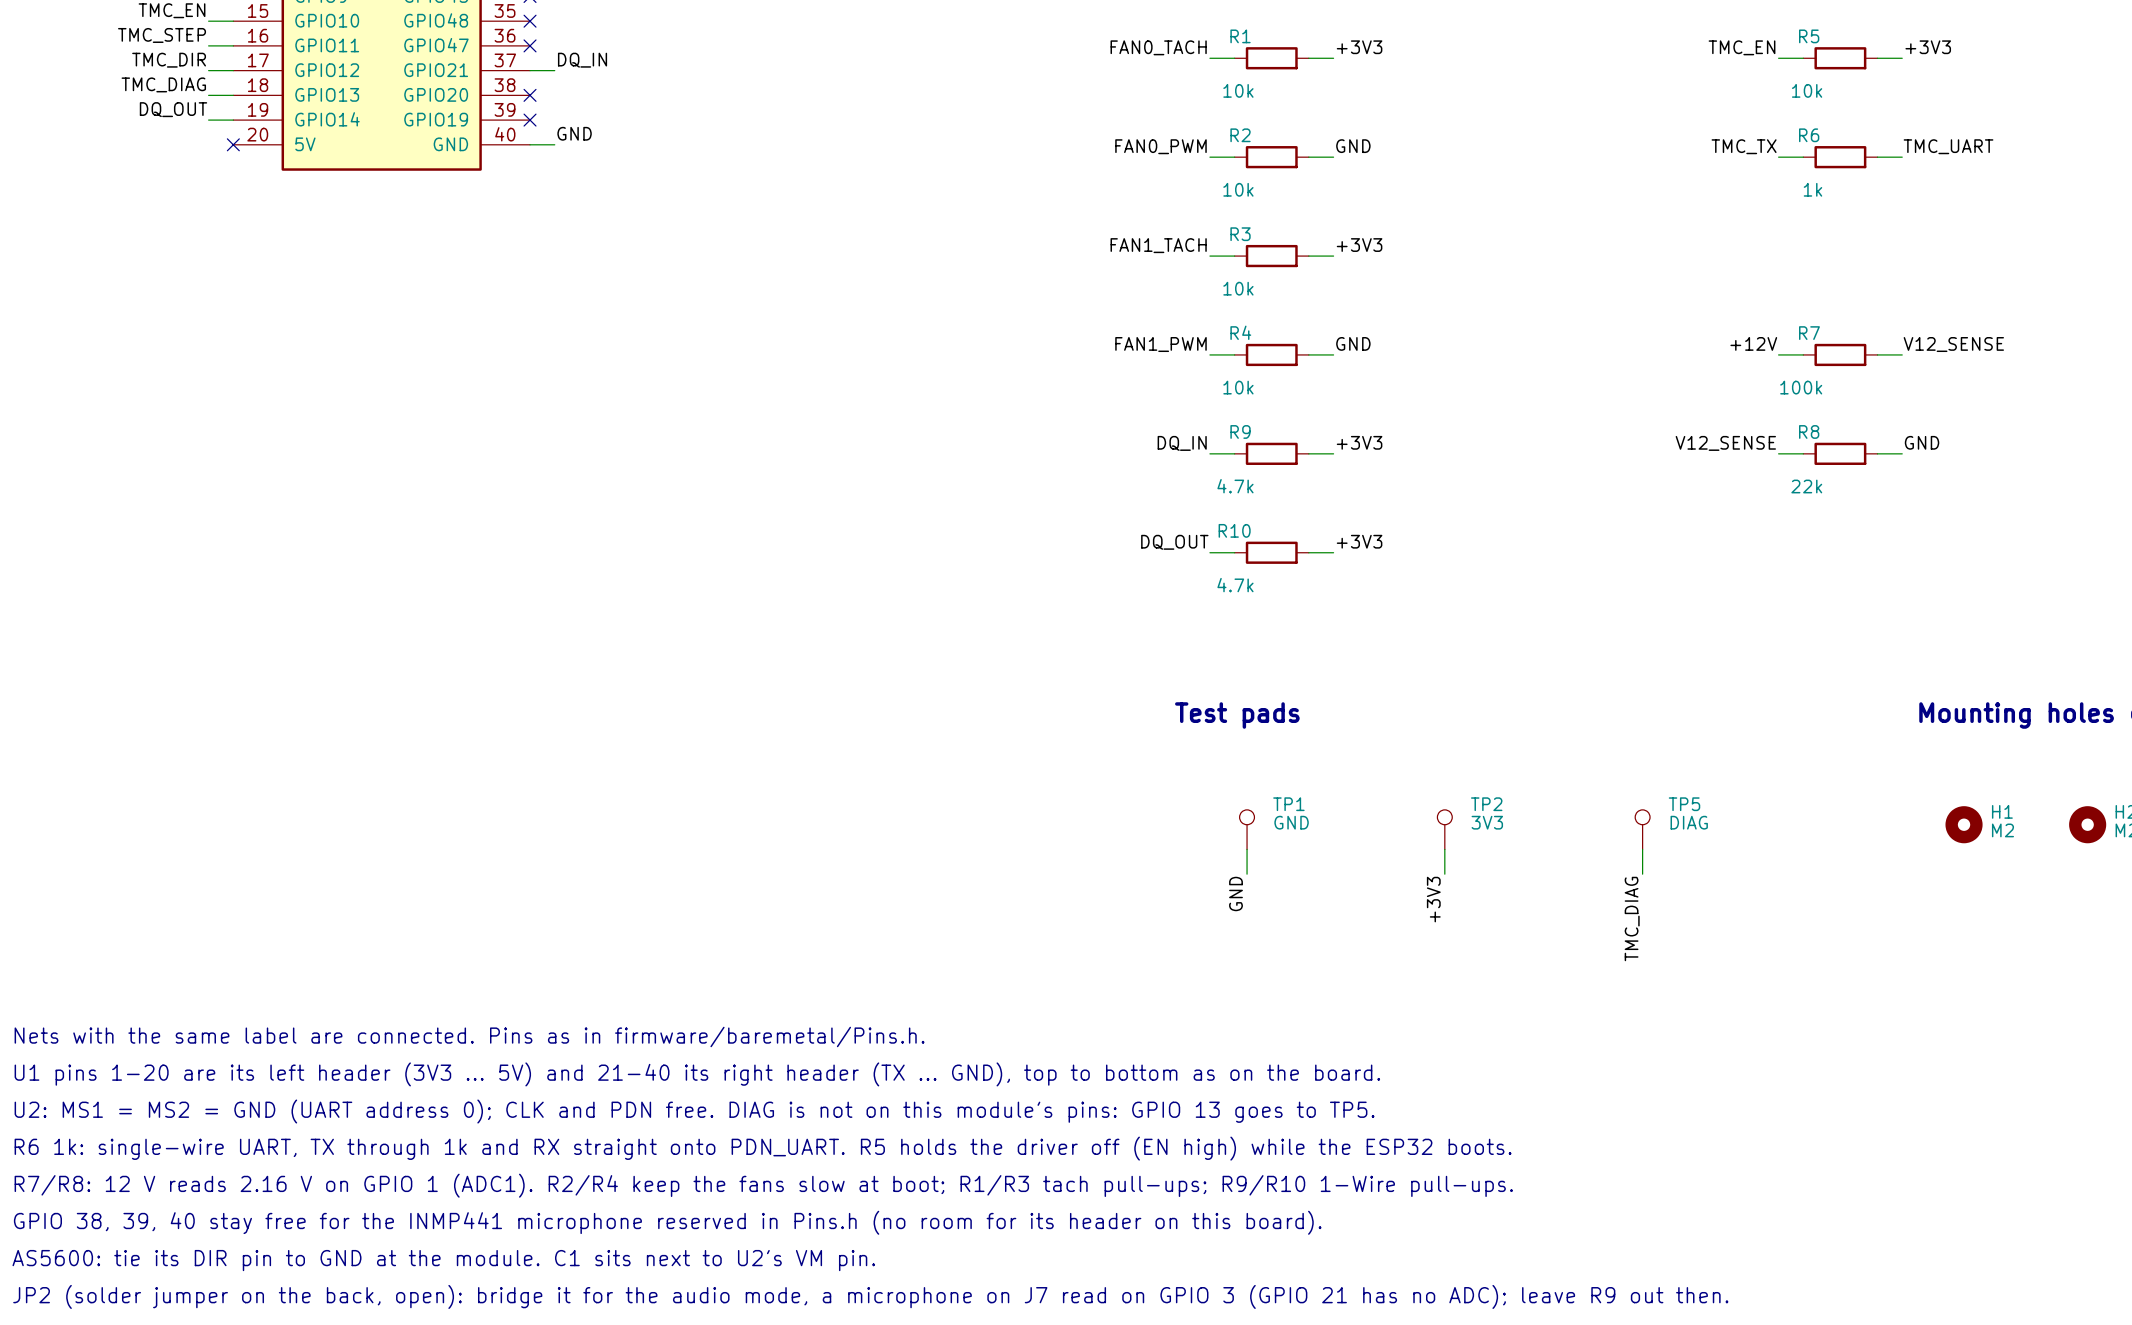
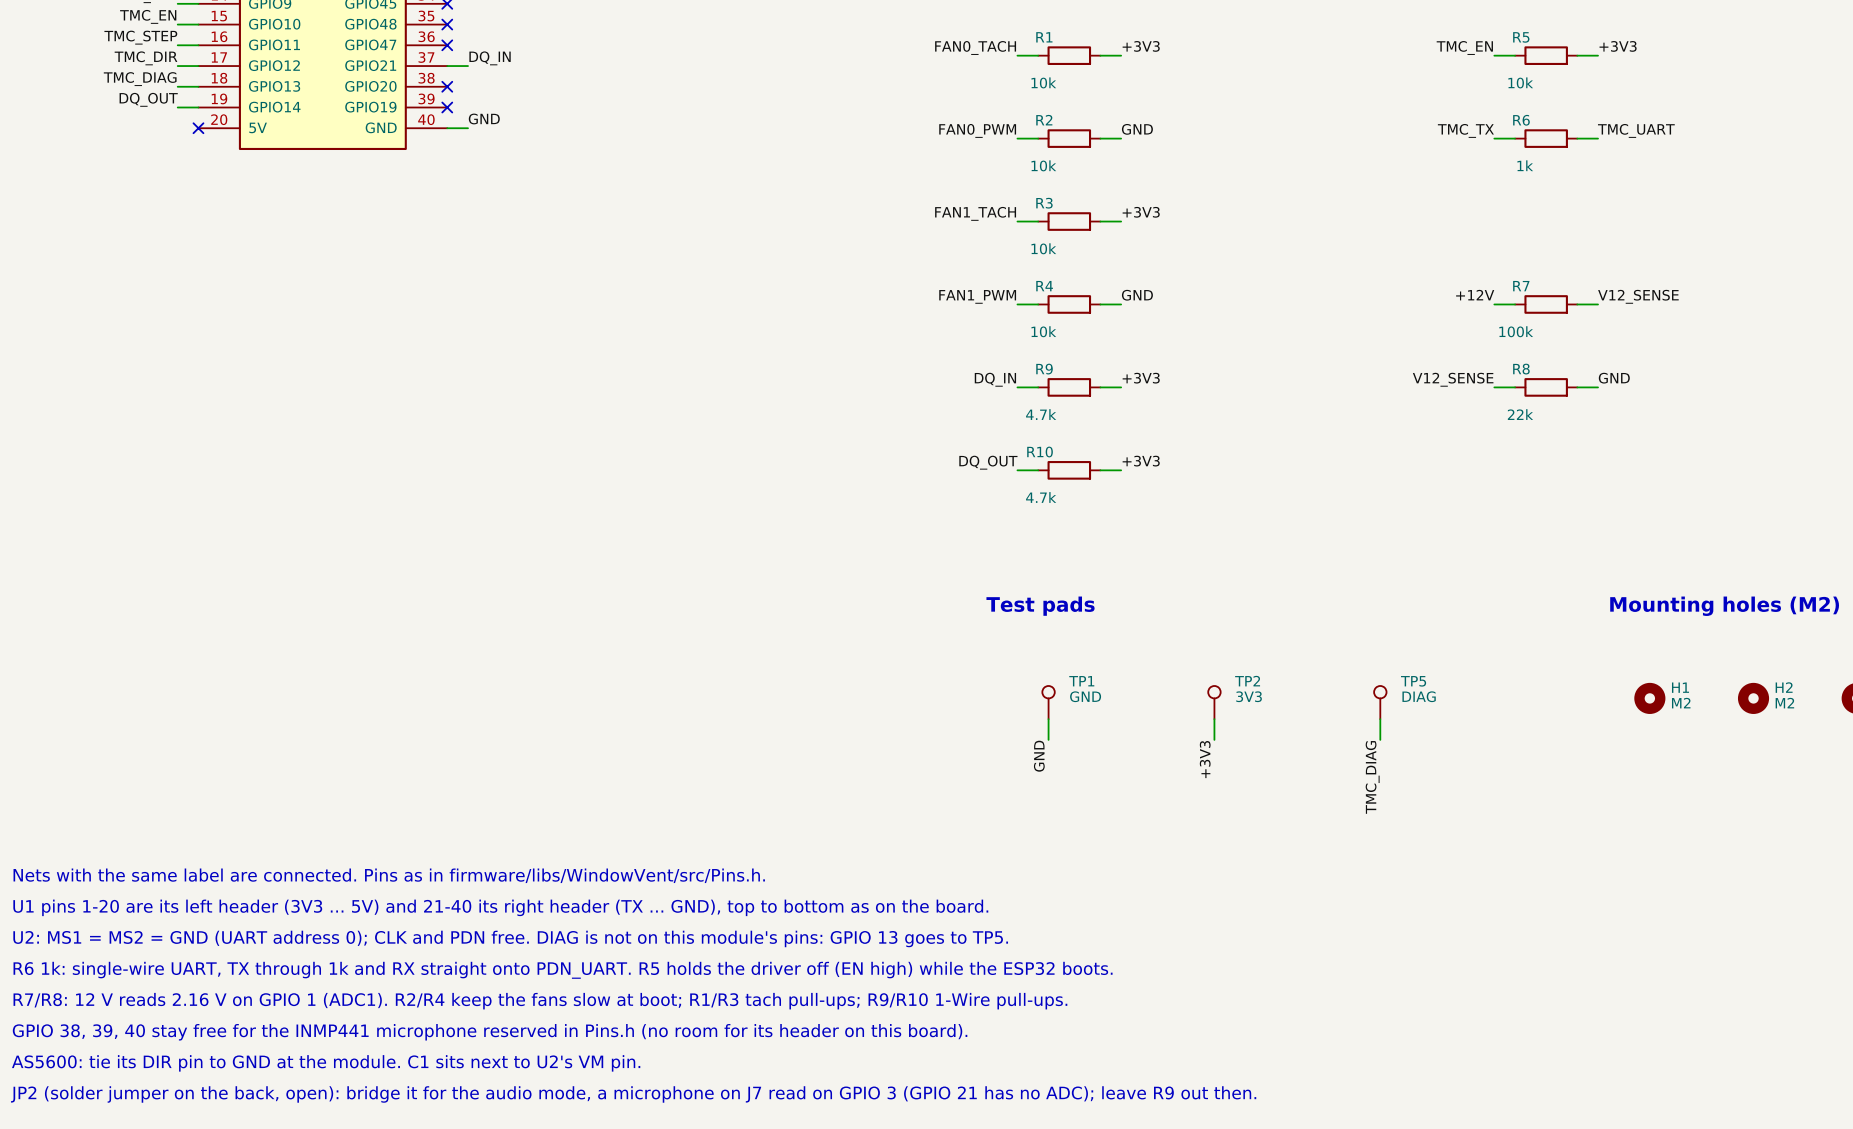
text: Nets with the same label are connected. Pins as in firmware/baremetal/Pins.h. (469, 1036) -> Nets with the same label are connected. Pins as in firmware/libs/WindowVent/src/Pins.h. (389, 875)

